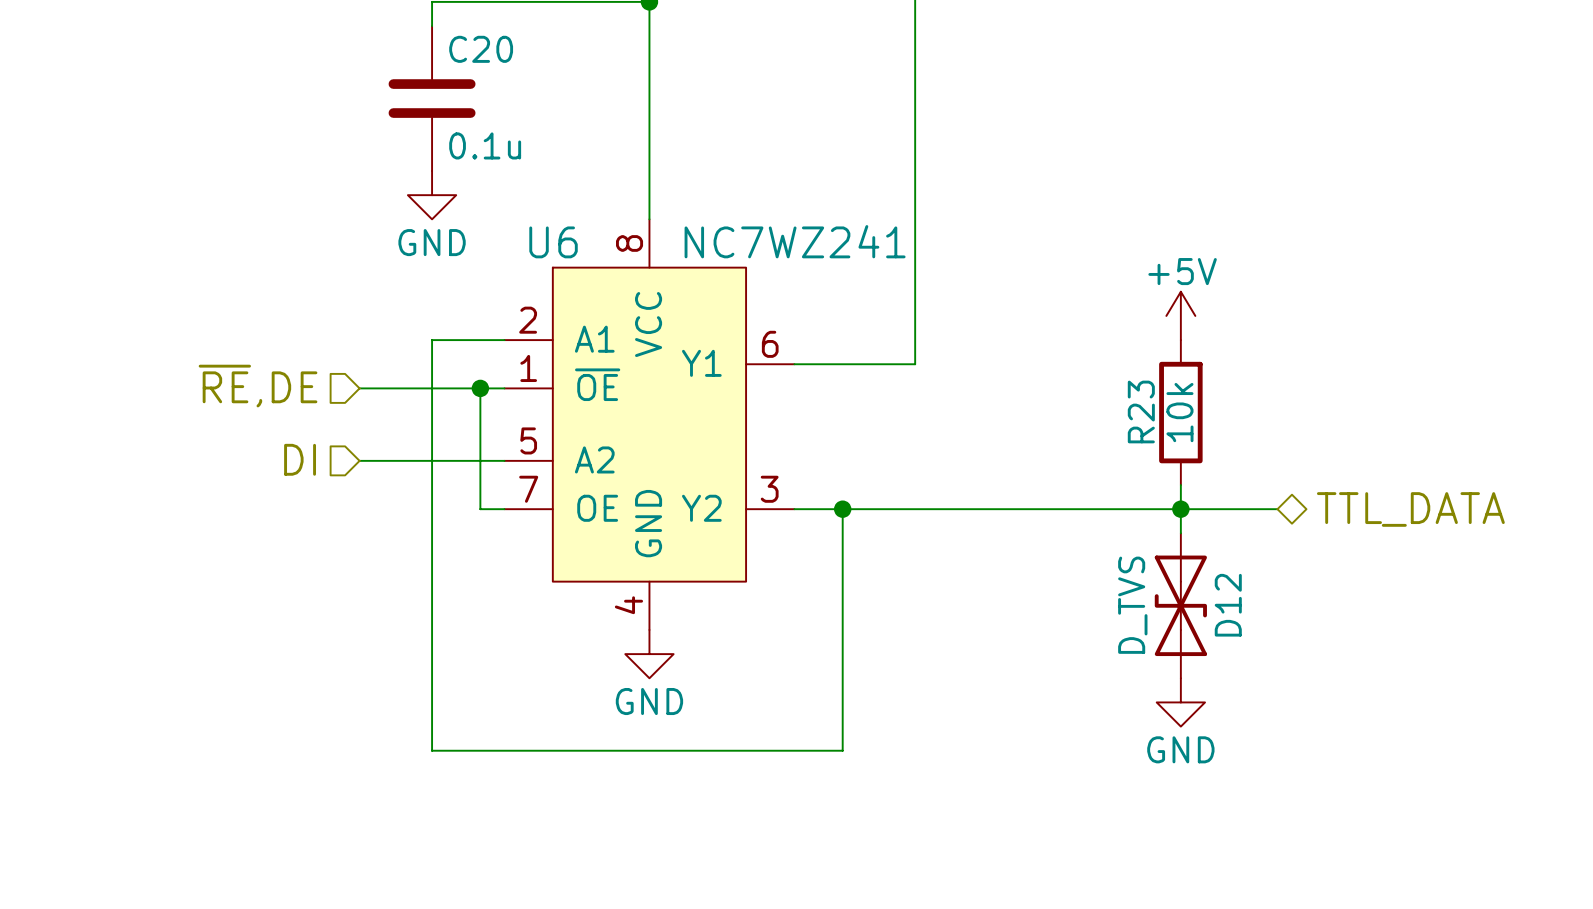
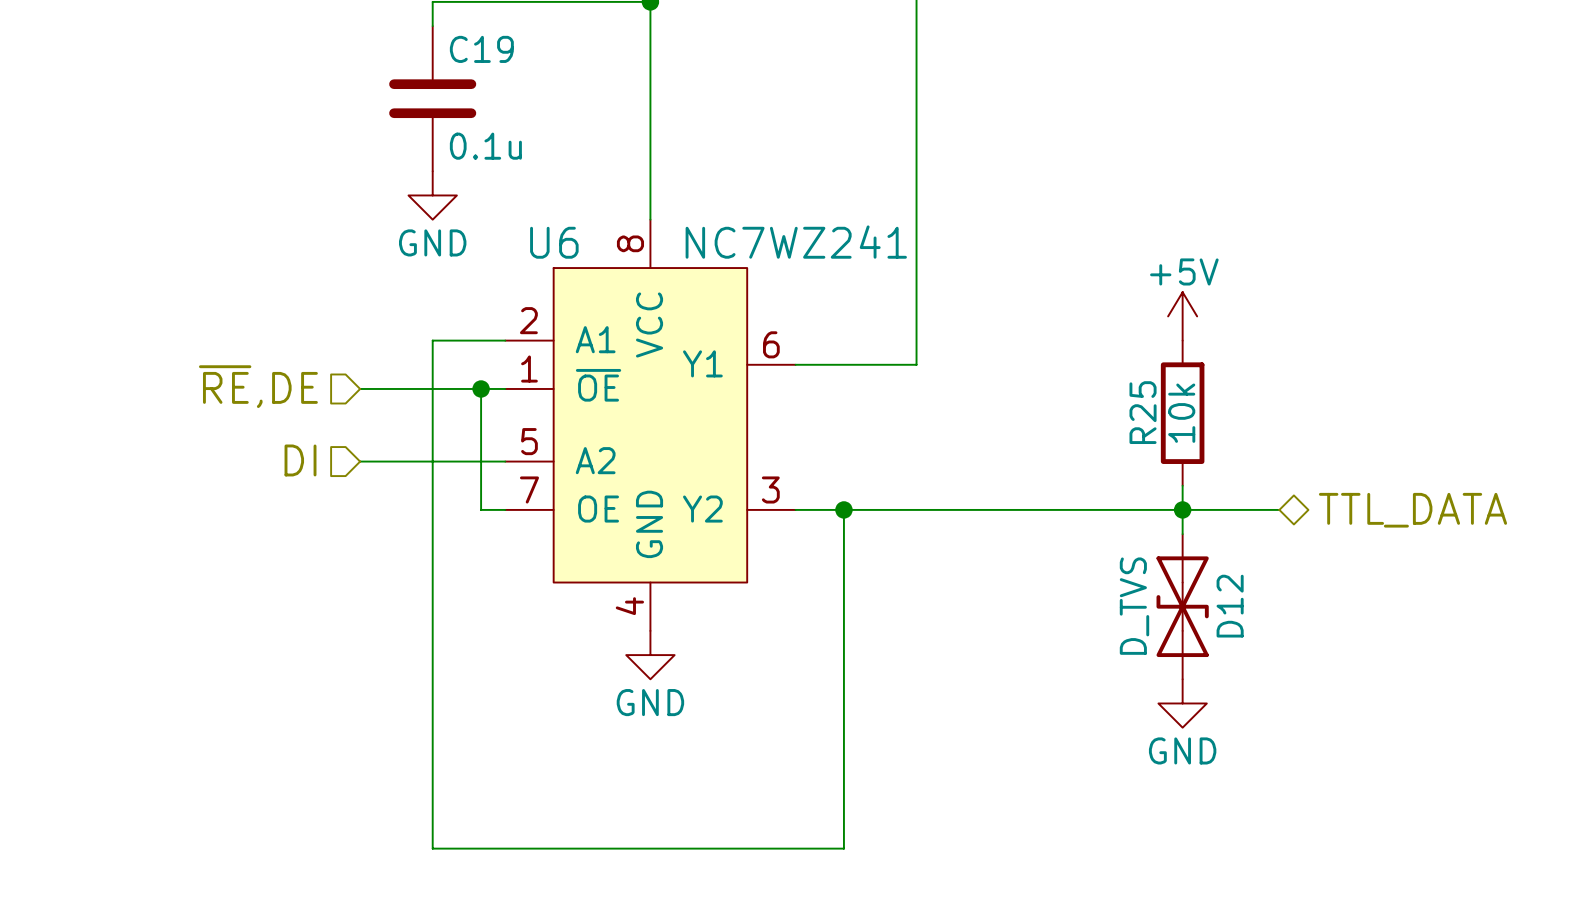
C20 name: C20 (481, 49) -> C19 (481, 49)
R23 name: R23 (1141, 411) -> R25 (1143, 412)
wire: (432, 750) (842, 750) -> (432, 751) (432, 848) (843, 848) (843, 751)

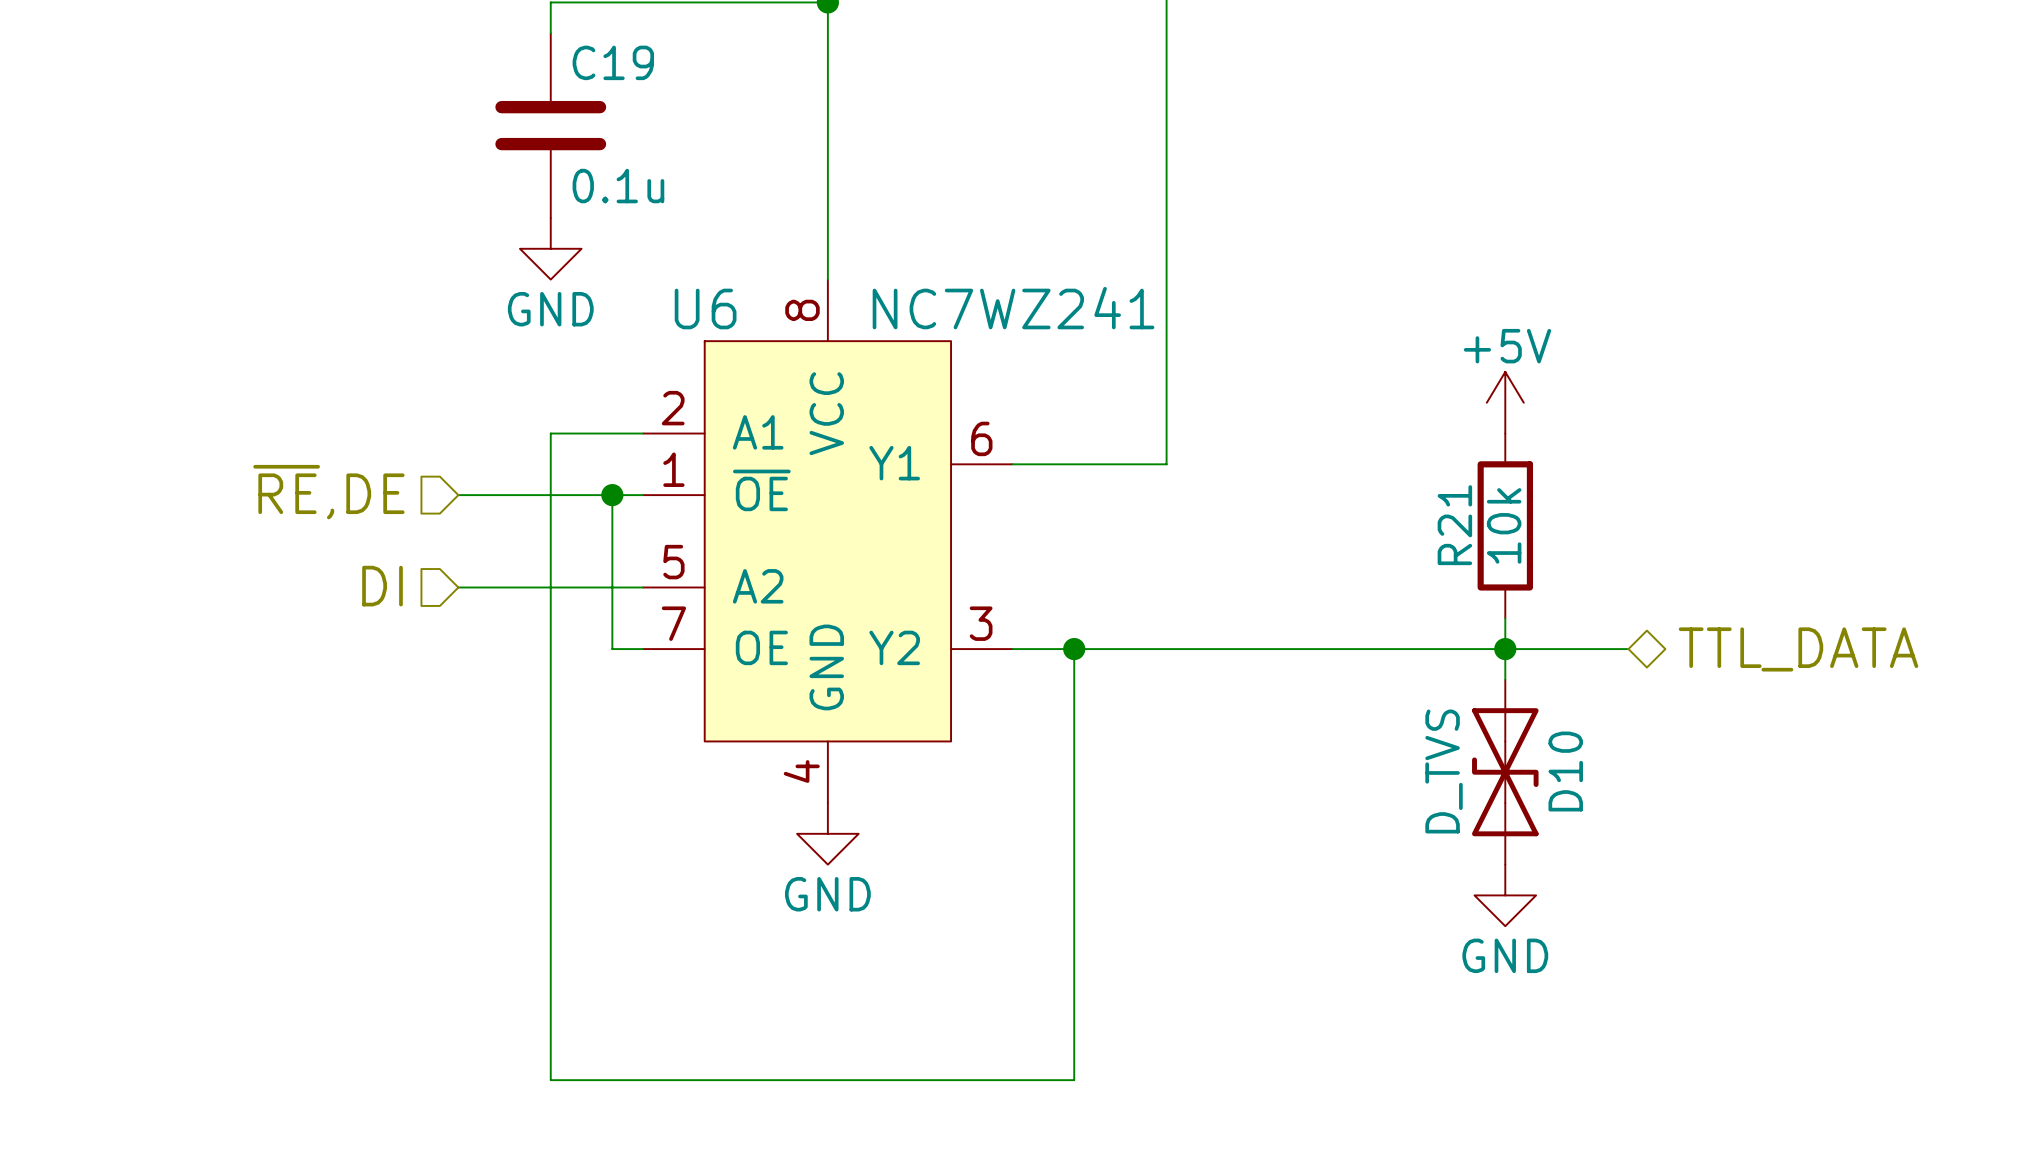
R25 name: R25 (1143, 412) -> R21 (1454, 525)
D12 name: D12 (1230, 606) -> D10 (1565, 771)

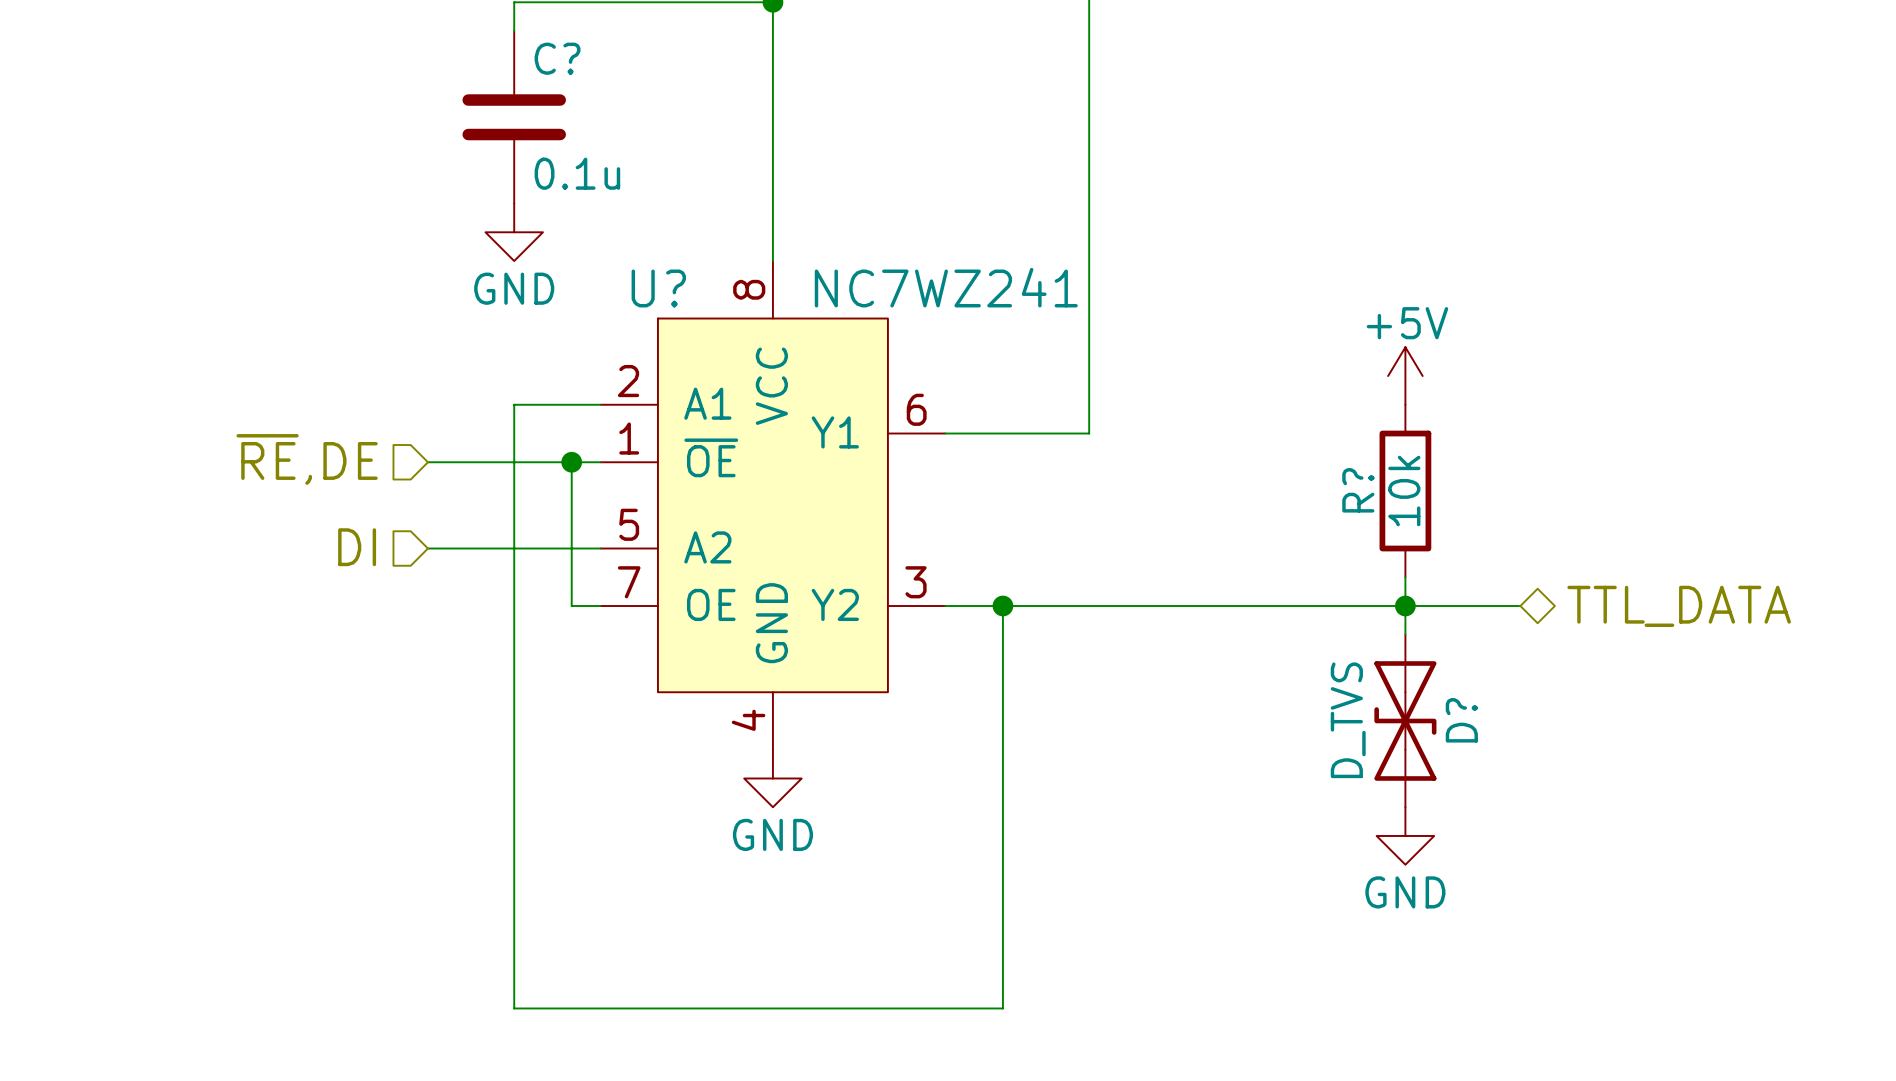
C19 name: C19 (613, 62) -> C? (557, 58)
U6 name: U6 (705, 308) -> U? (658, 288)
R21 name: R21 (1454, 525) -> R? (1358, 490)
D10 name: D10 (1565, 771) -> D? (1461, 720)

